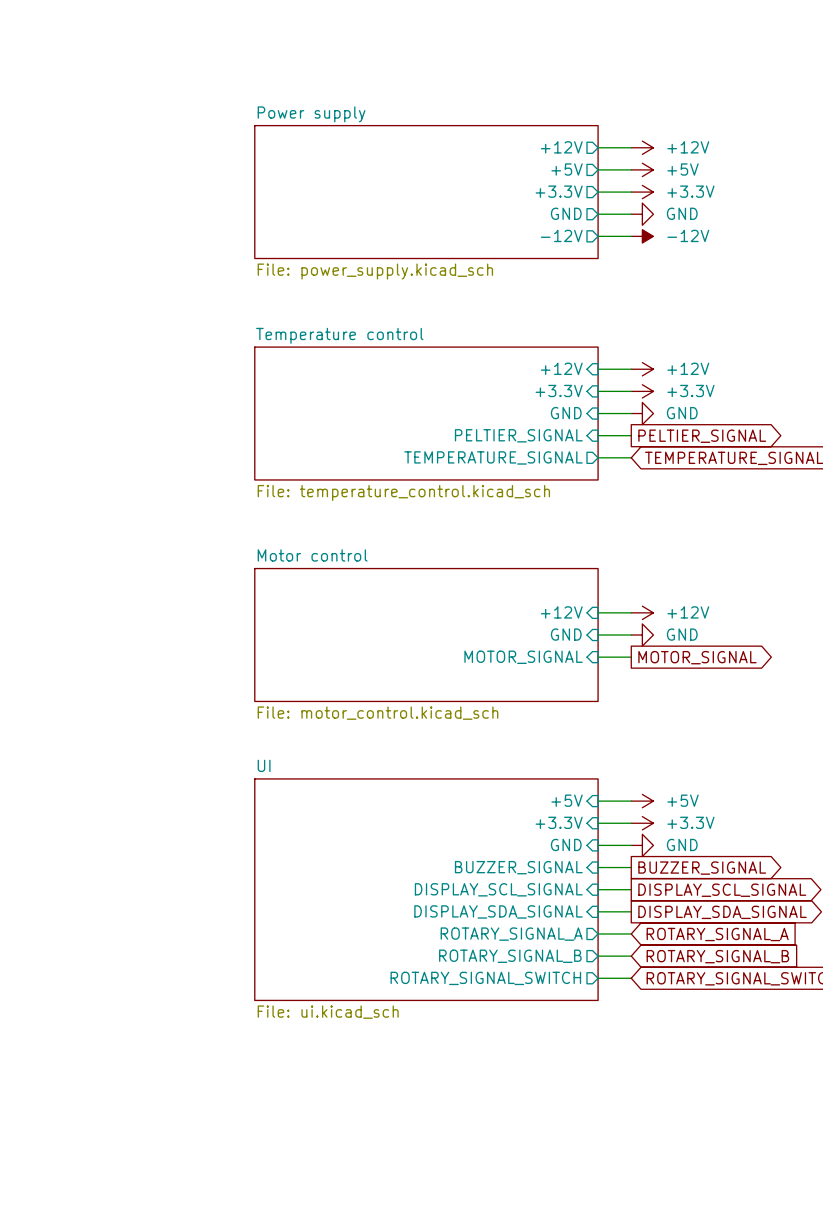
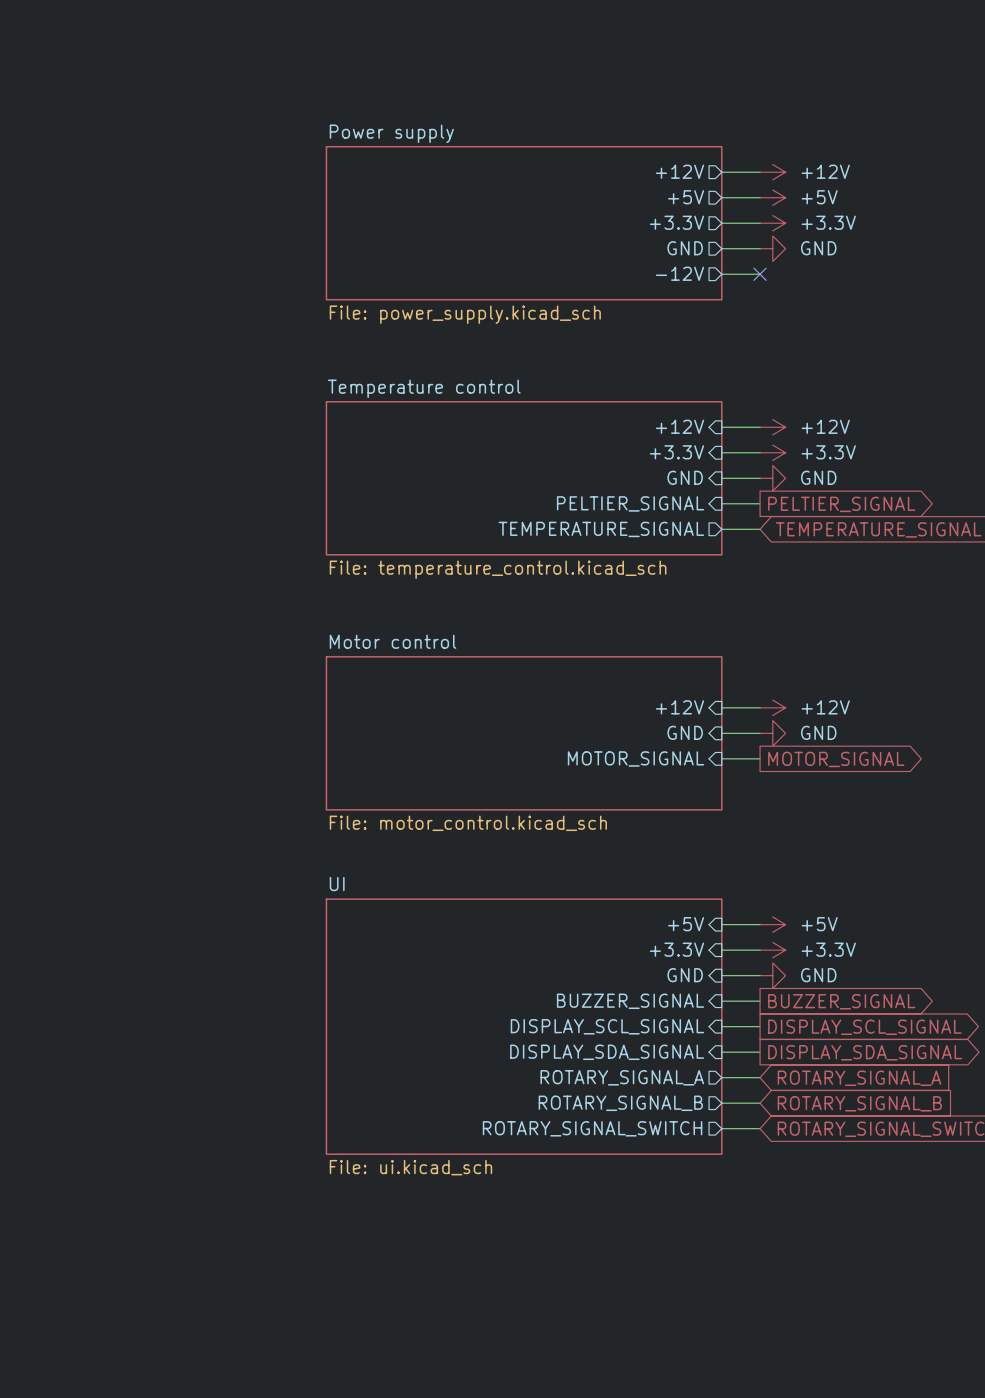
no-connect mark: none -> (760, 274)
power symbol: -12V (642, 236) -> none

